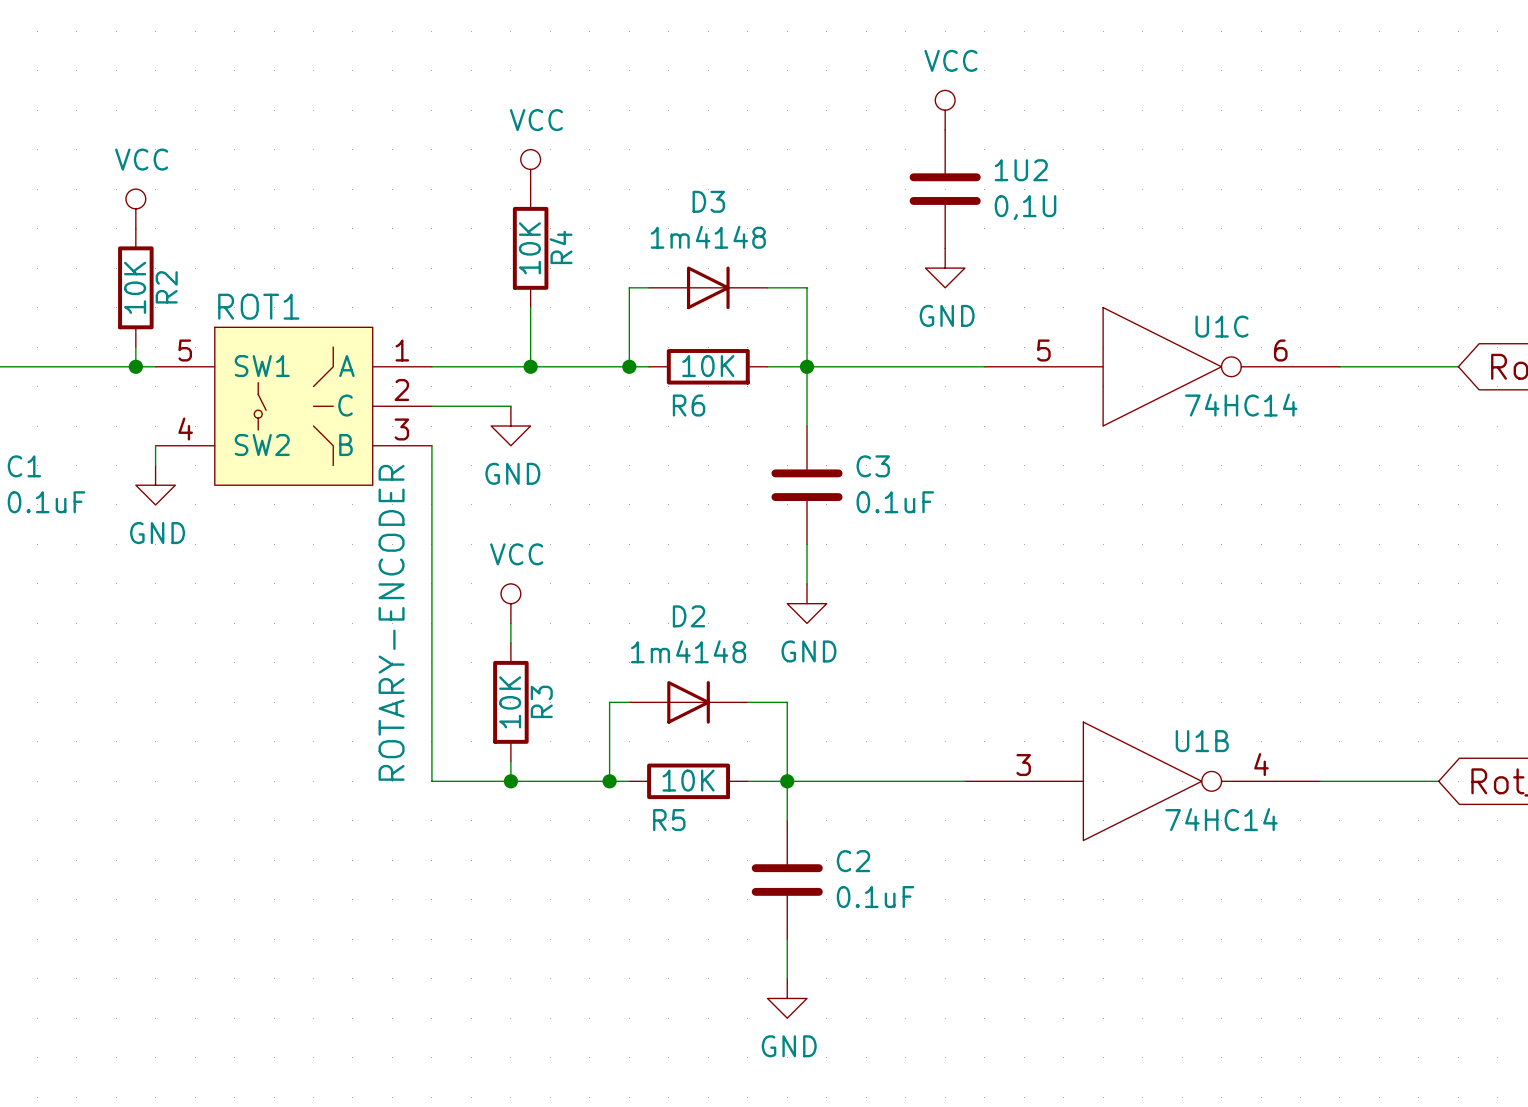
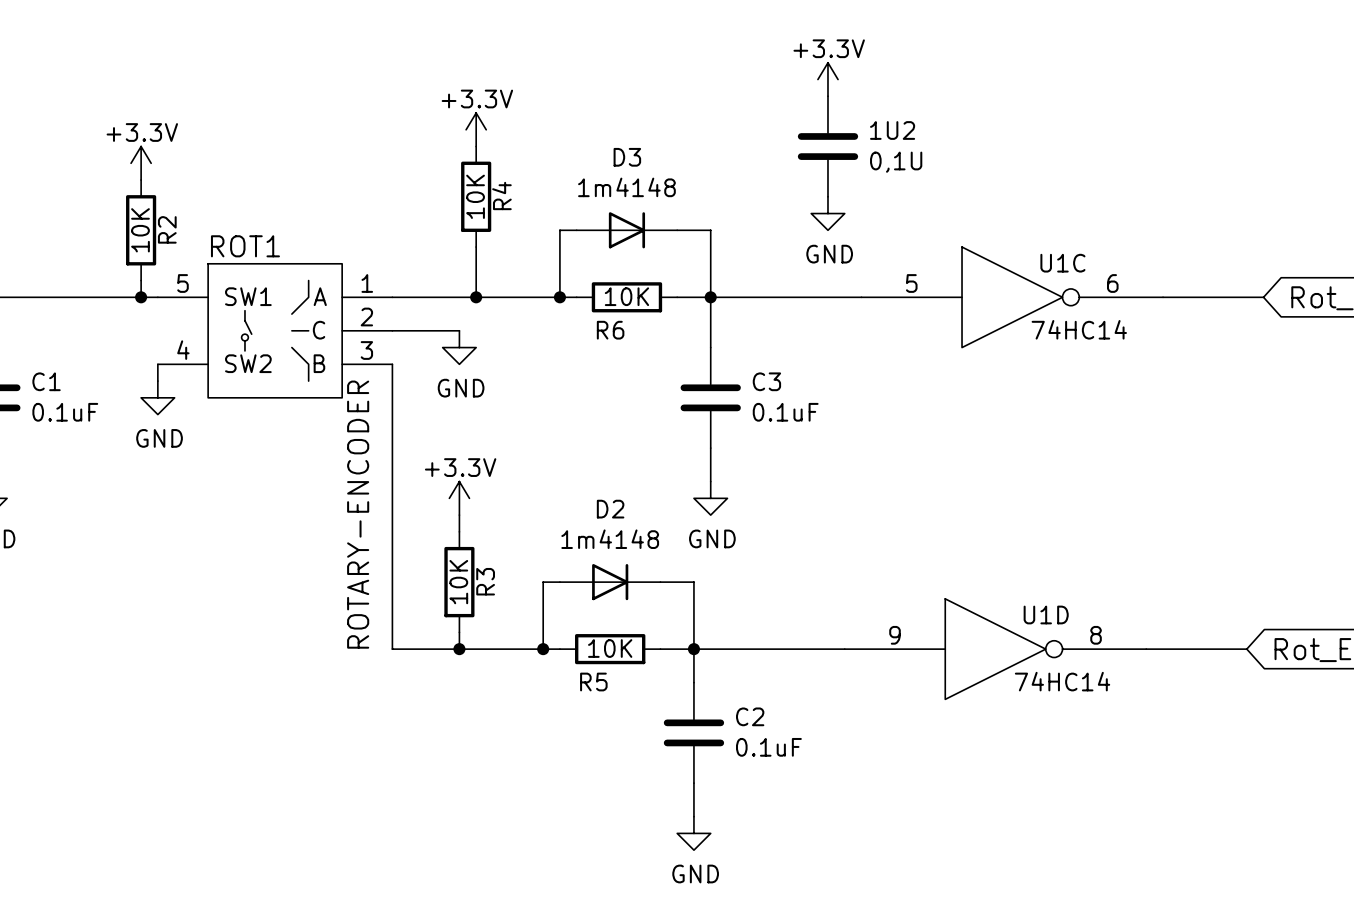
power symbol: VCC (945, 110) -> +3.3V (827, 79)
power symbol: VCC (530, 169) -> +3.3V (476, 129)
power symbol: VCC (135, 208) -> +3.3V (141, 163)
power symbol: VCC (510, 603) -> +3.3V (459, 498)
U1B name: U1B (1202, 741) -> U1D (1046, 614)
U1B pin number: 4 (1261, 764) -> 8 (1096, 635)
U1B pin number: 3 (1023, 765) -> 9 (895, 635)

